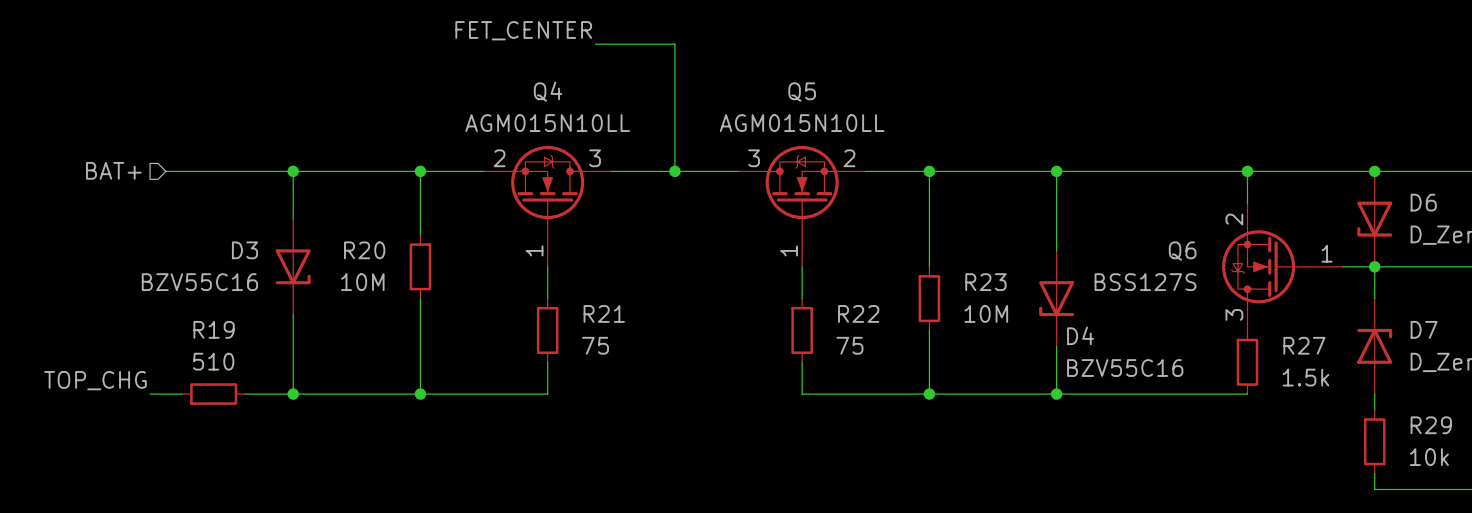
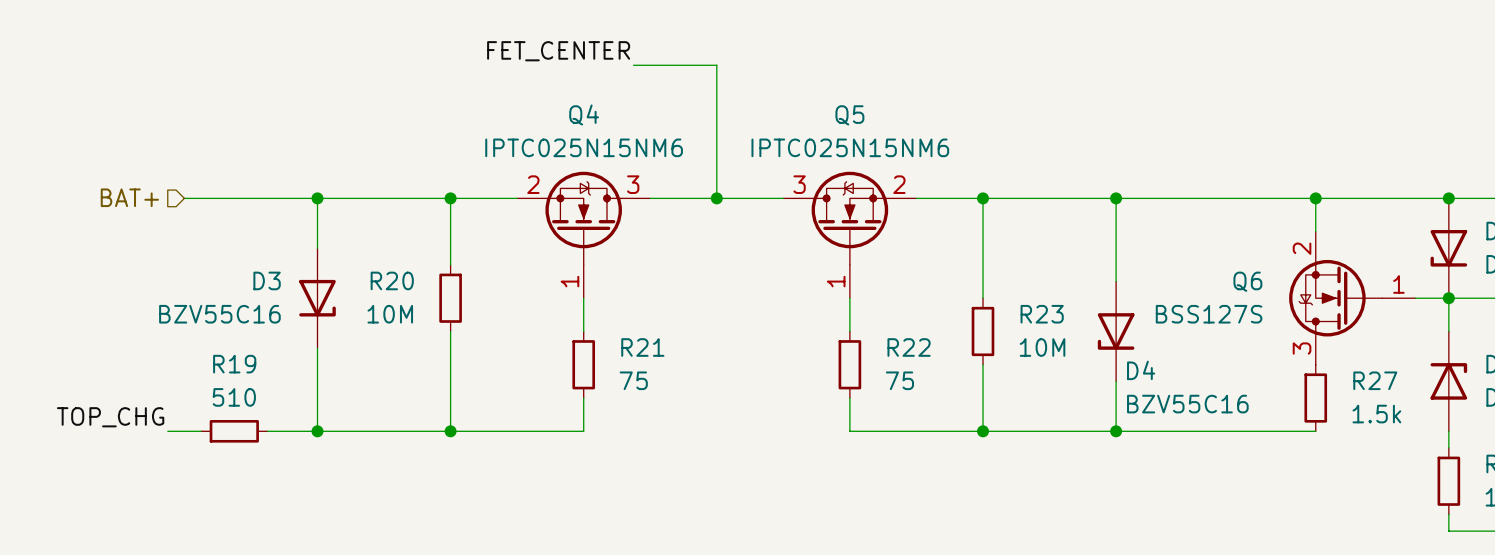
Q4 value: AGM015N10LL (547, 123) -> IPTC025N15NM6 (584, 147)
Q5 value: AGM015N10LL (802, 123) -> IPTC025N15NM6 (850, 147)

